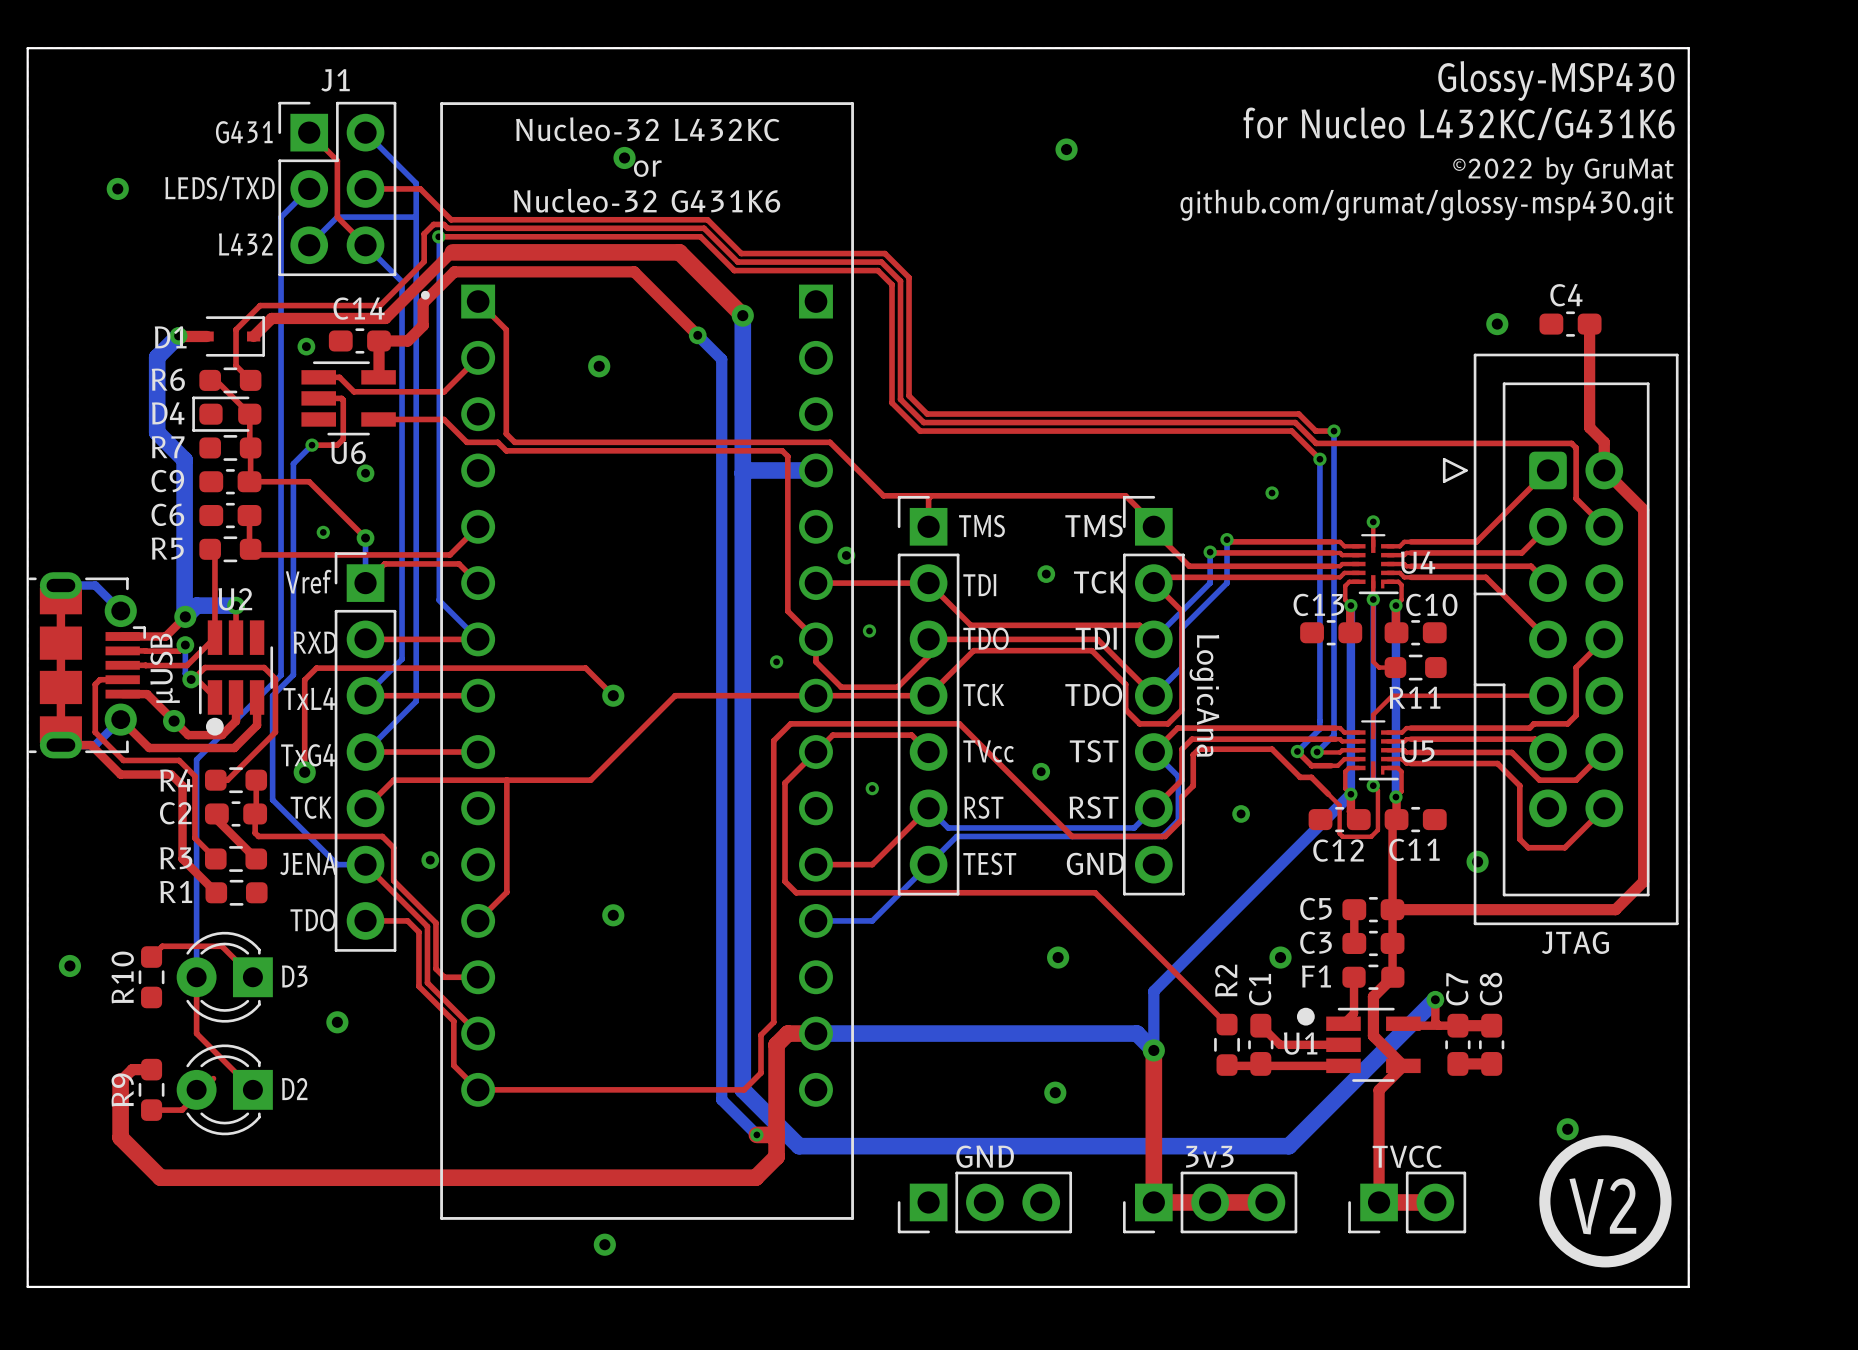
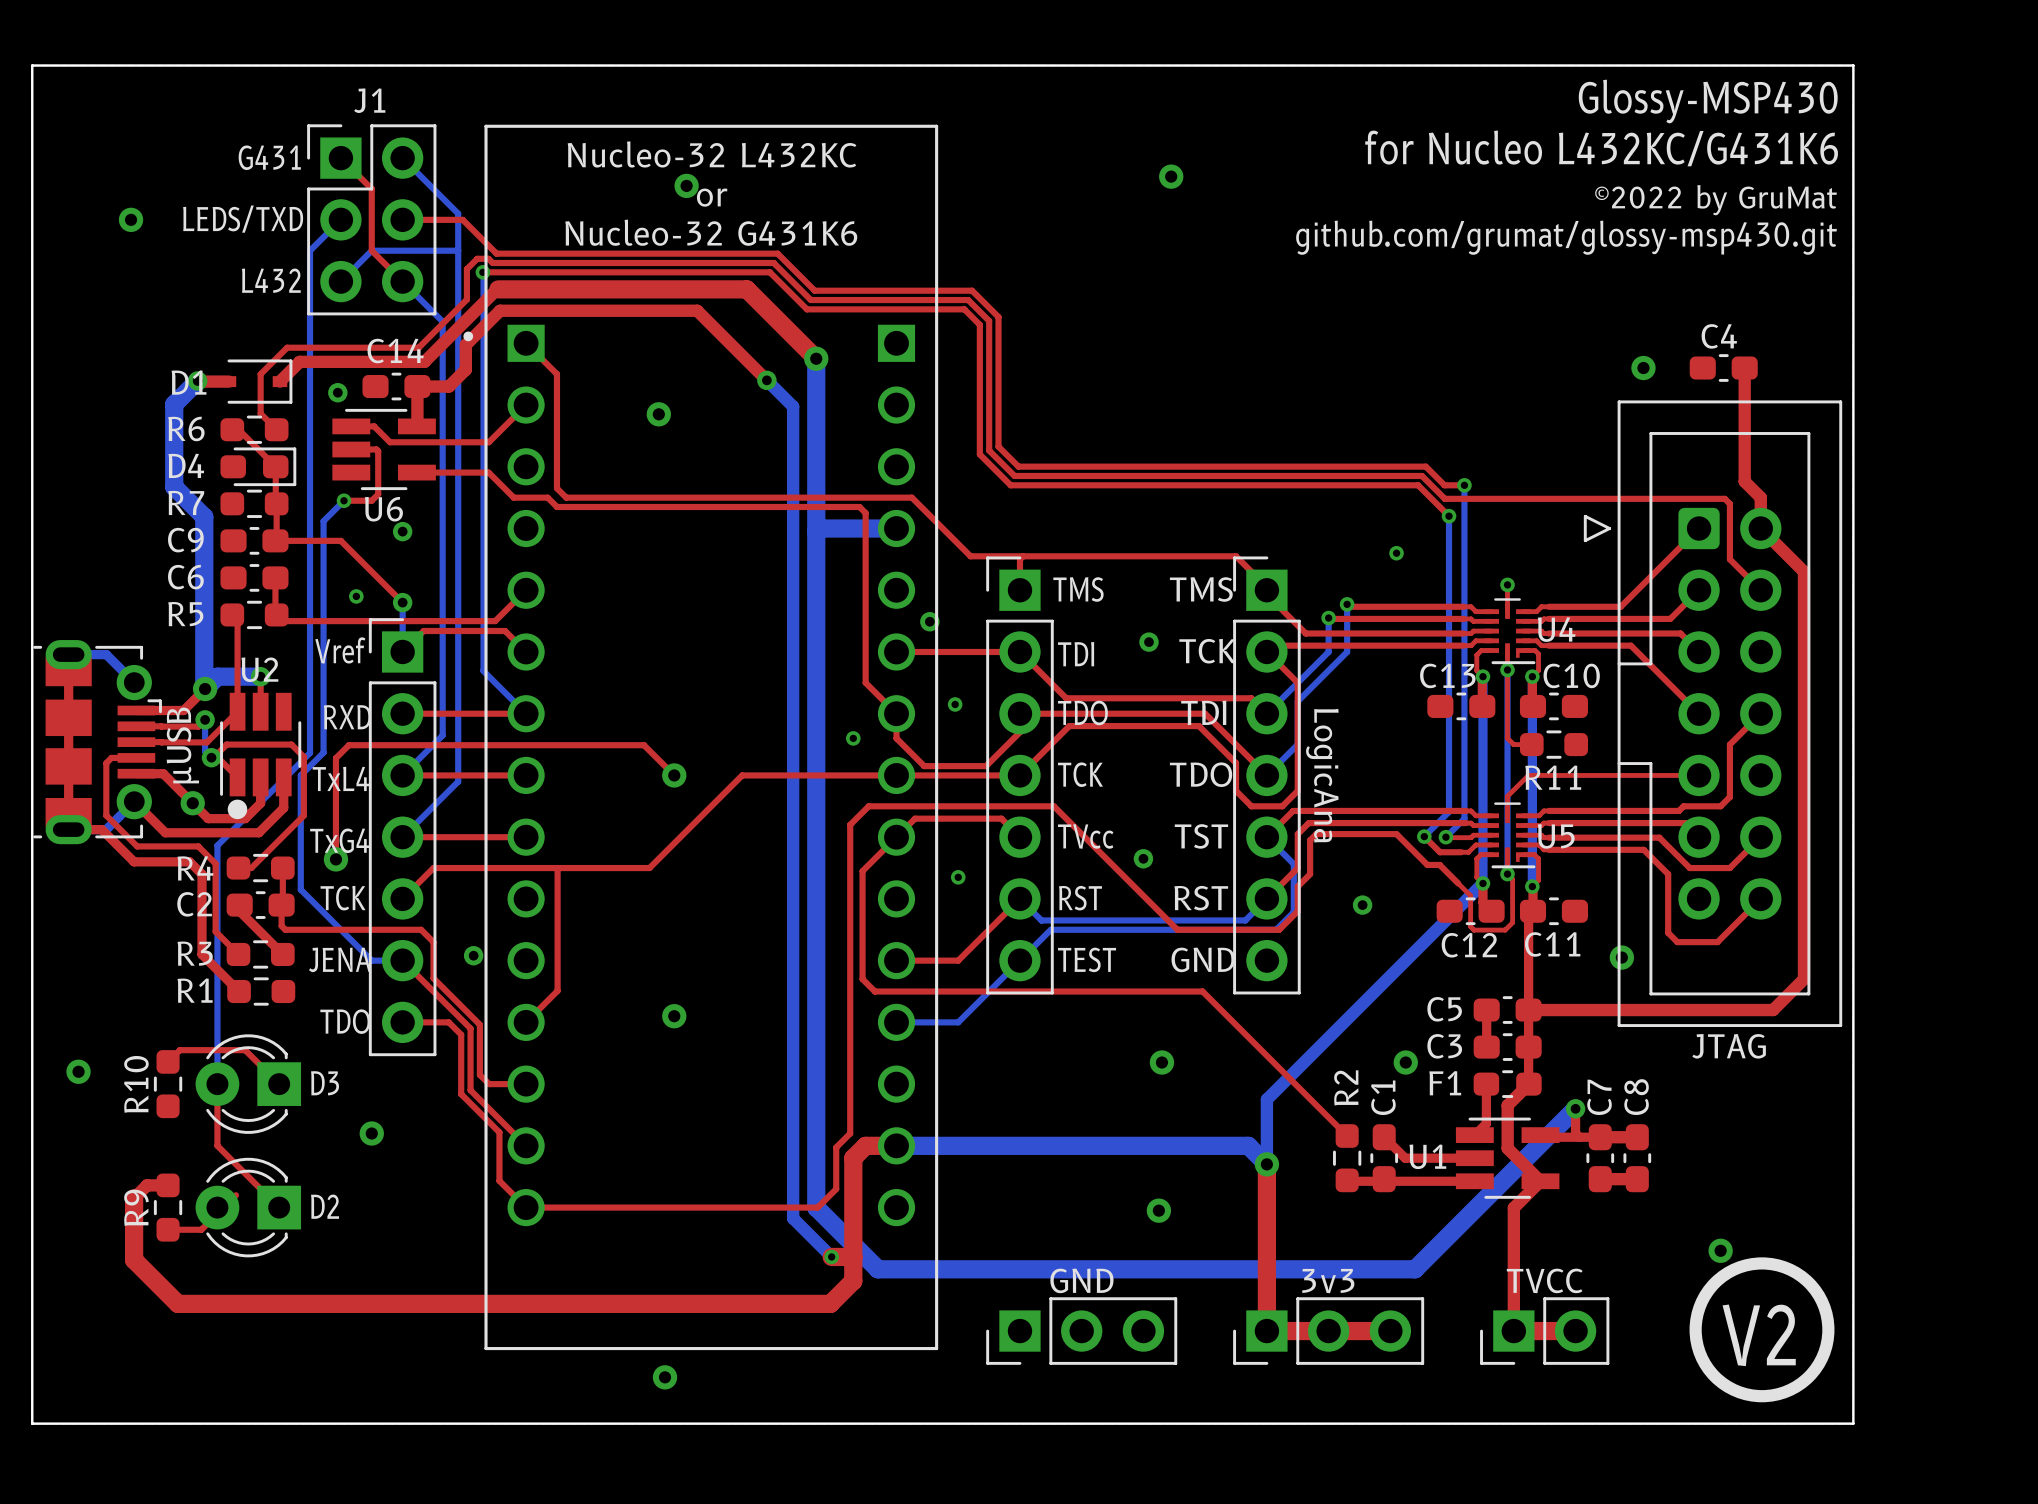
D4 rotation: 0° (226, 414) -> 180° (258, 466)
drawing: [1296, 1007, 1315, 1026] -> none

